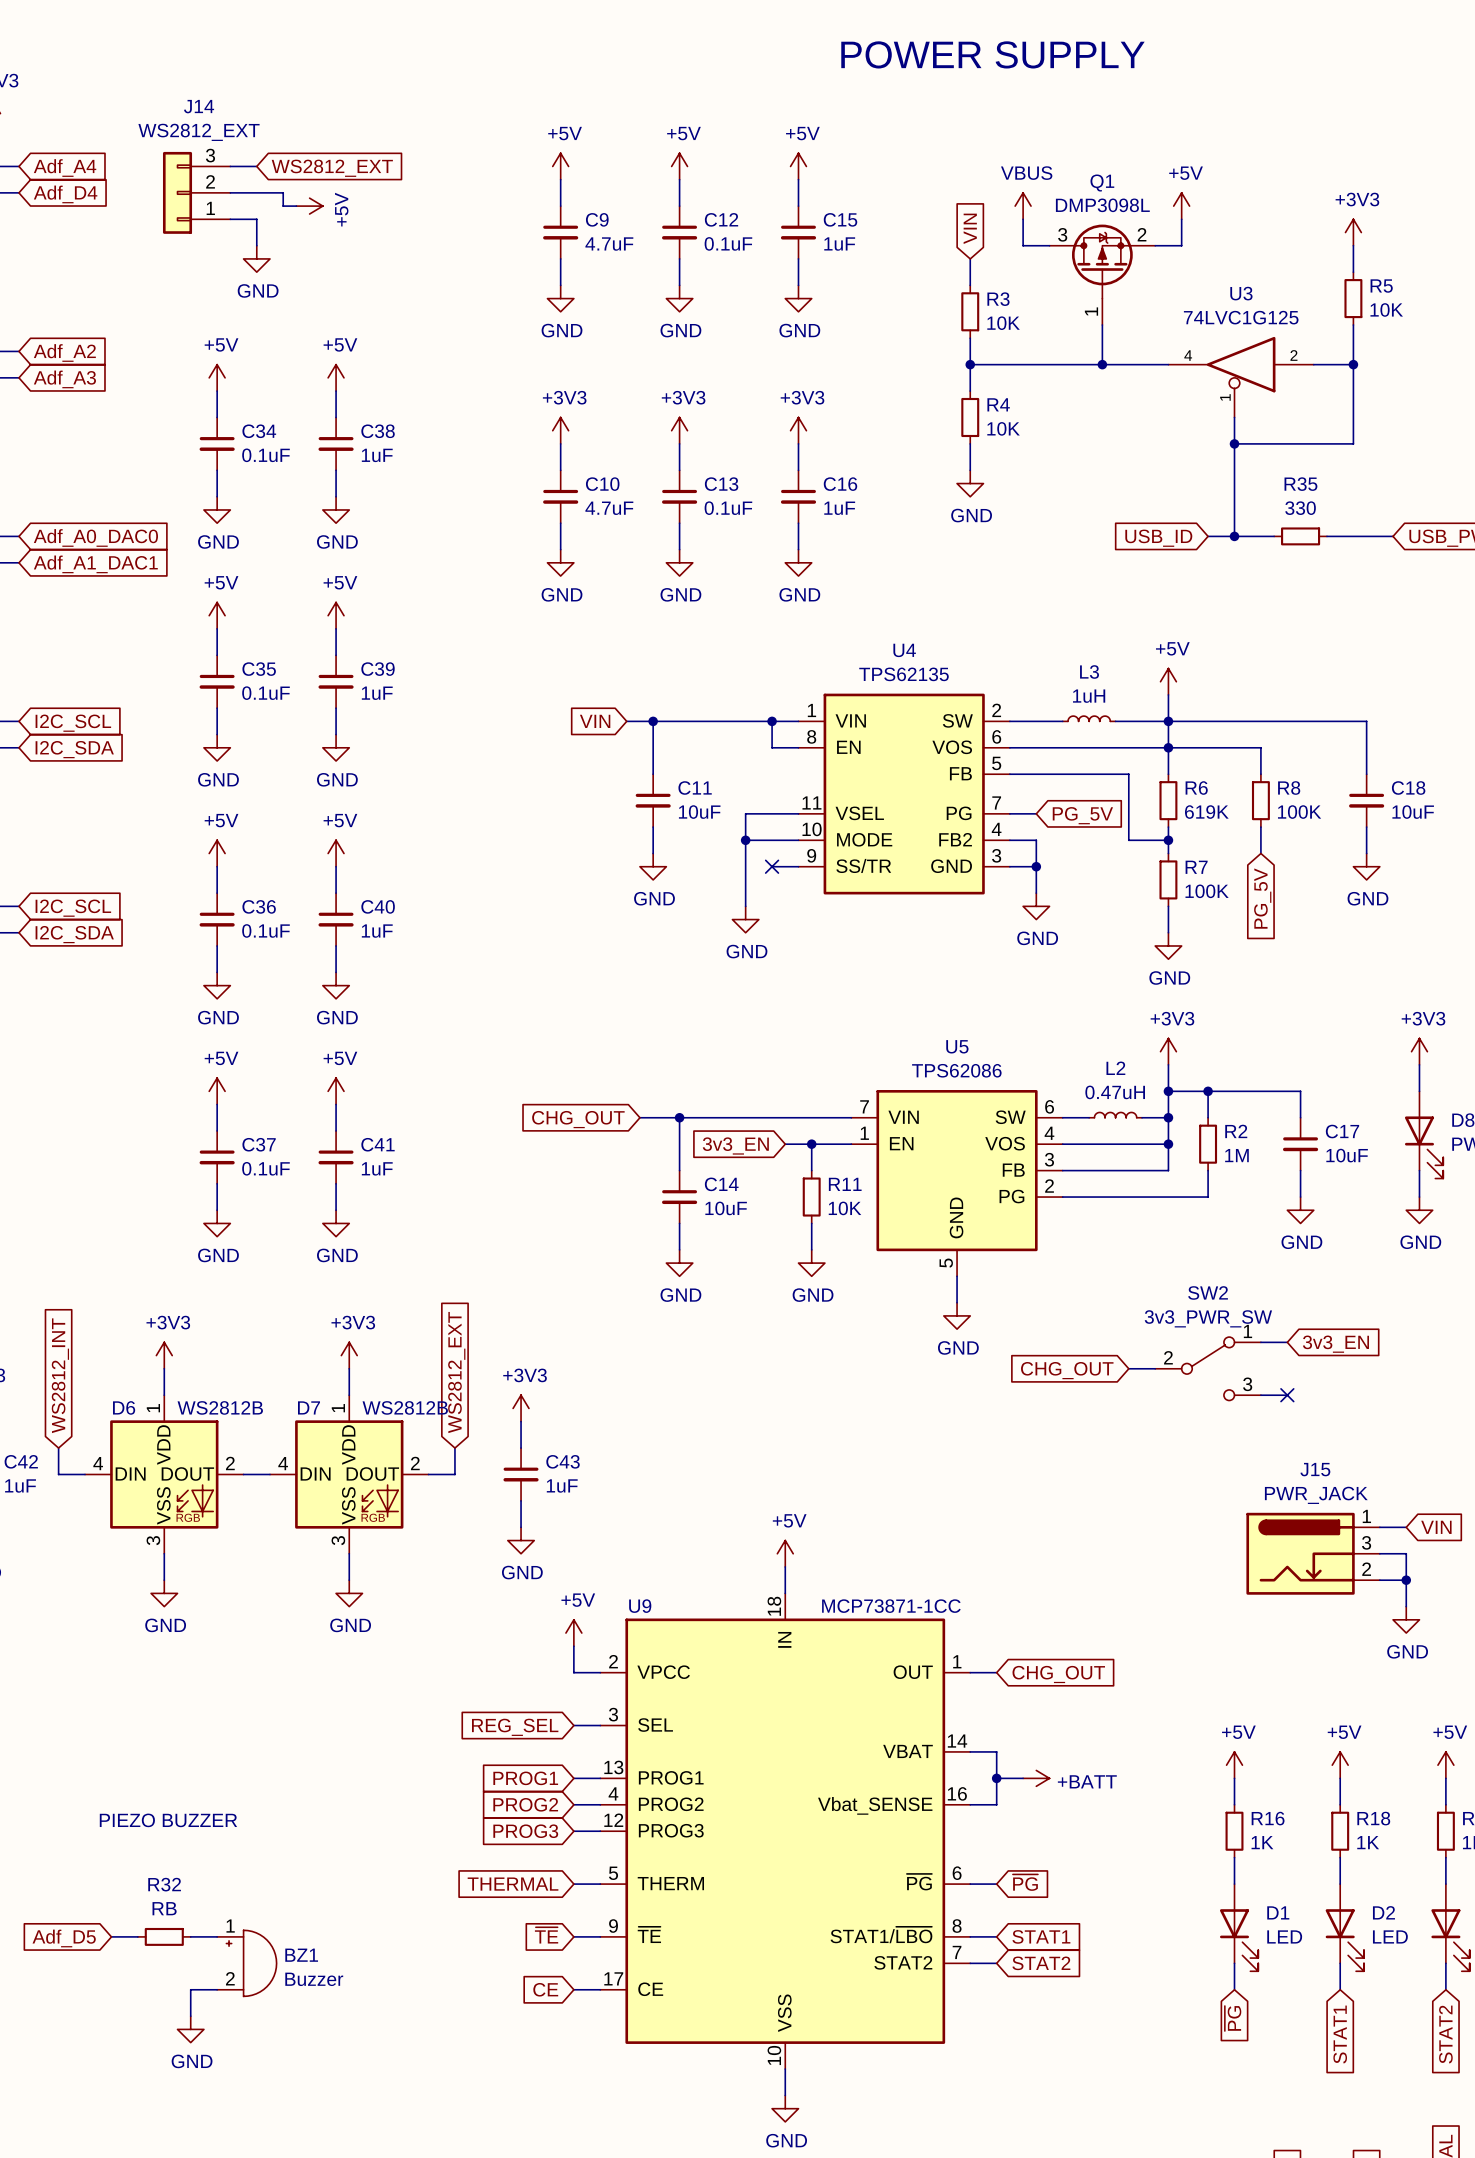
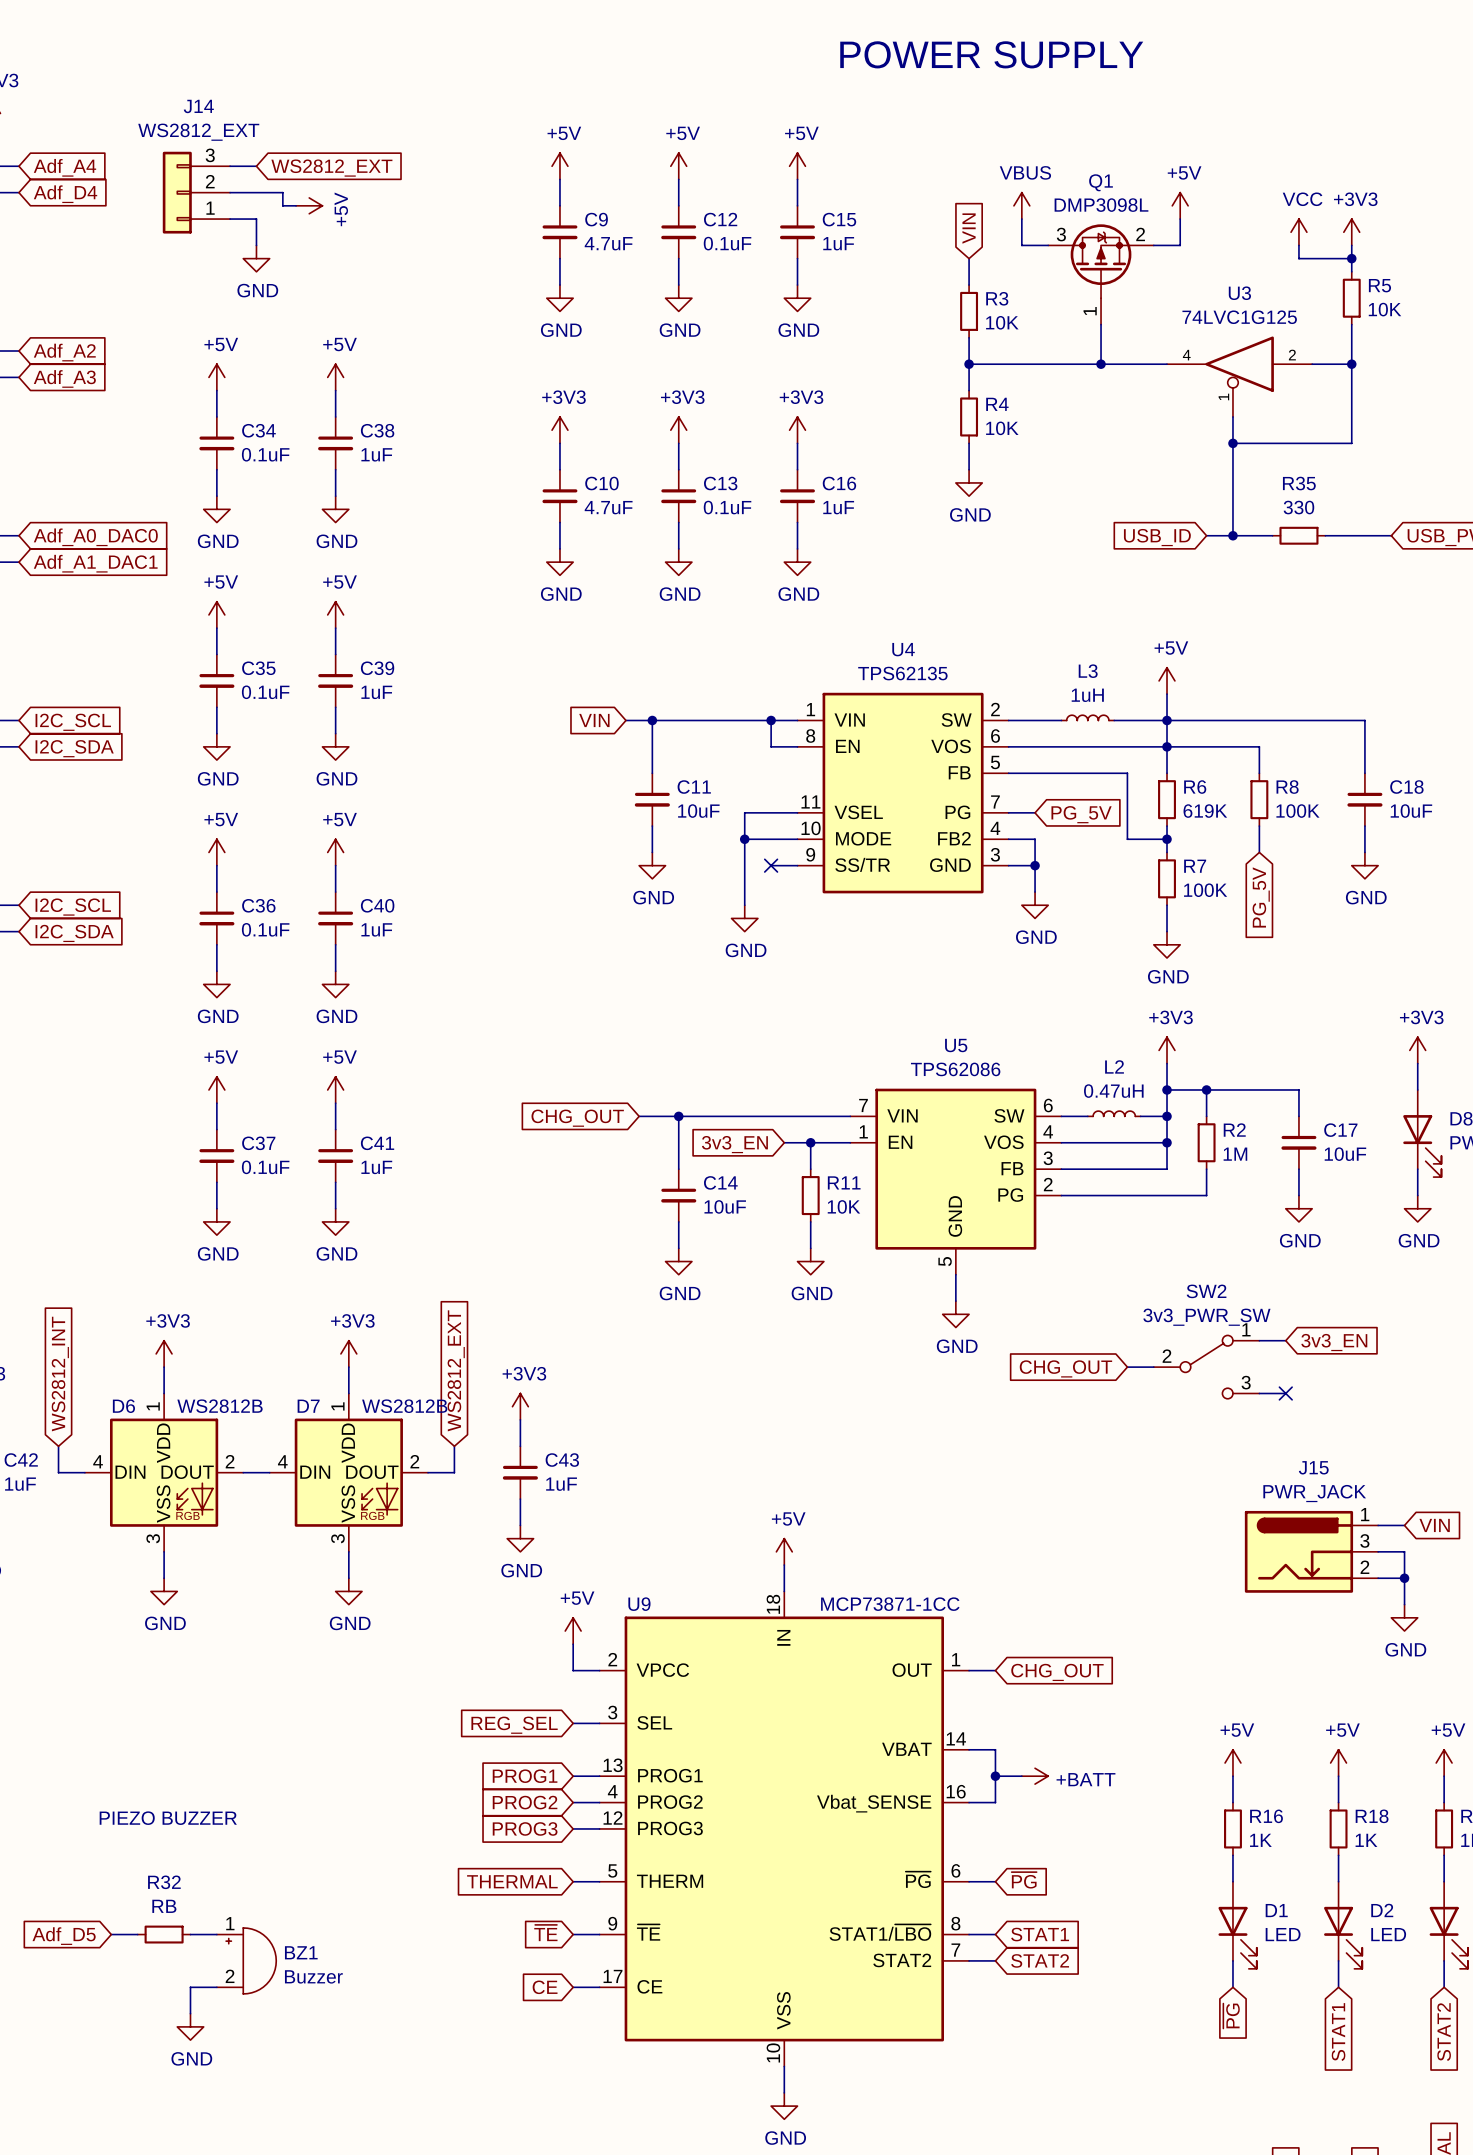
power symbol: none -> VCC (1298, 232)
wire: none -> (1298, 245) (1298, 258) (1351, 258)
junction: none -> (1351, 258)

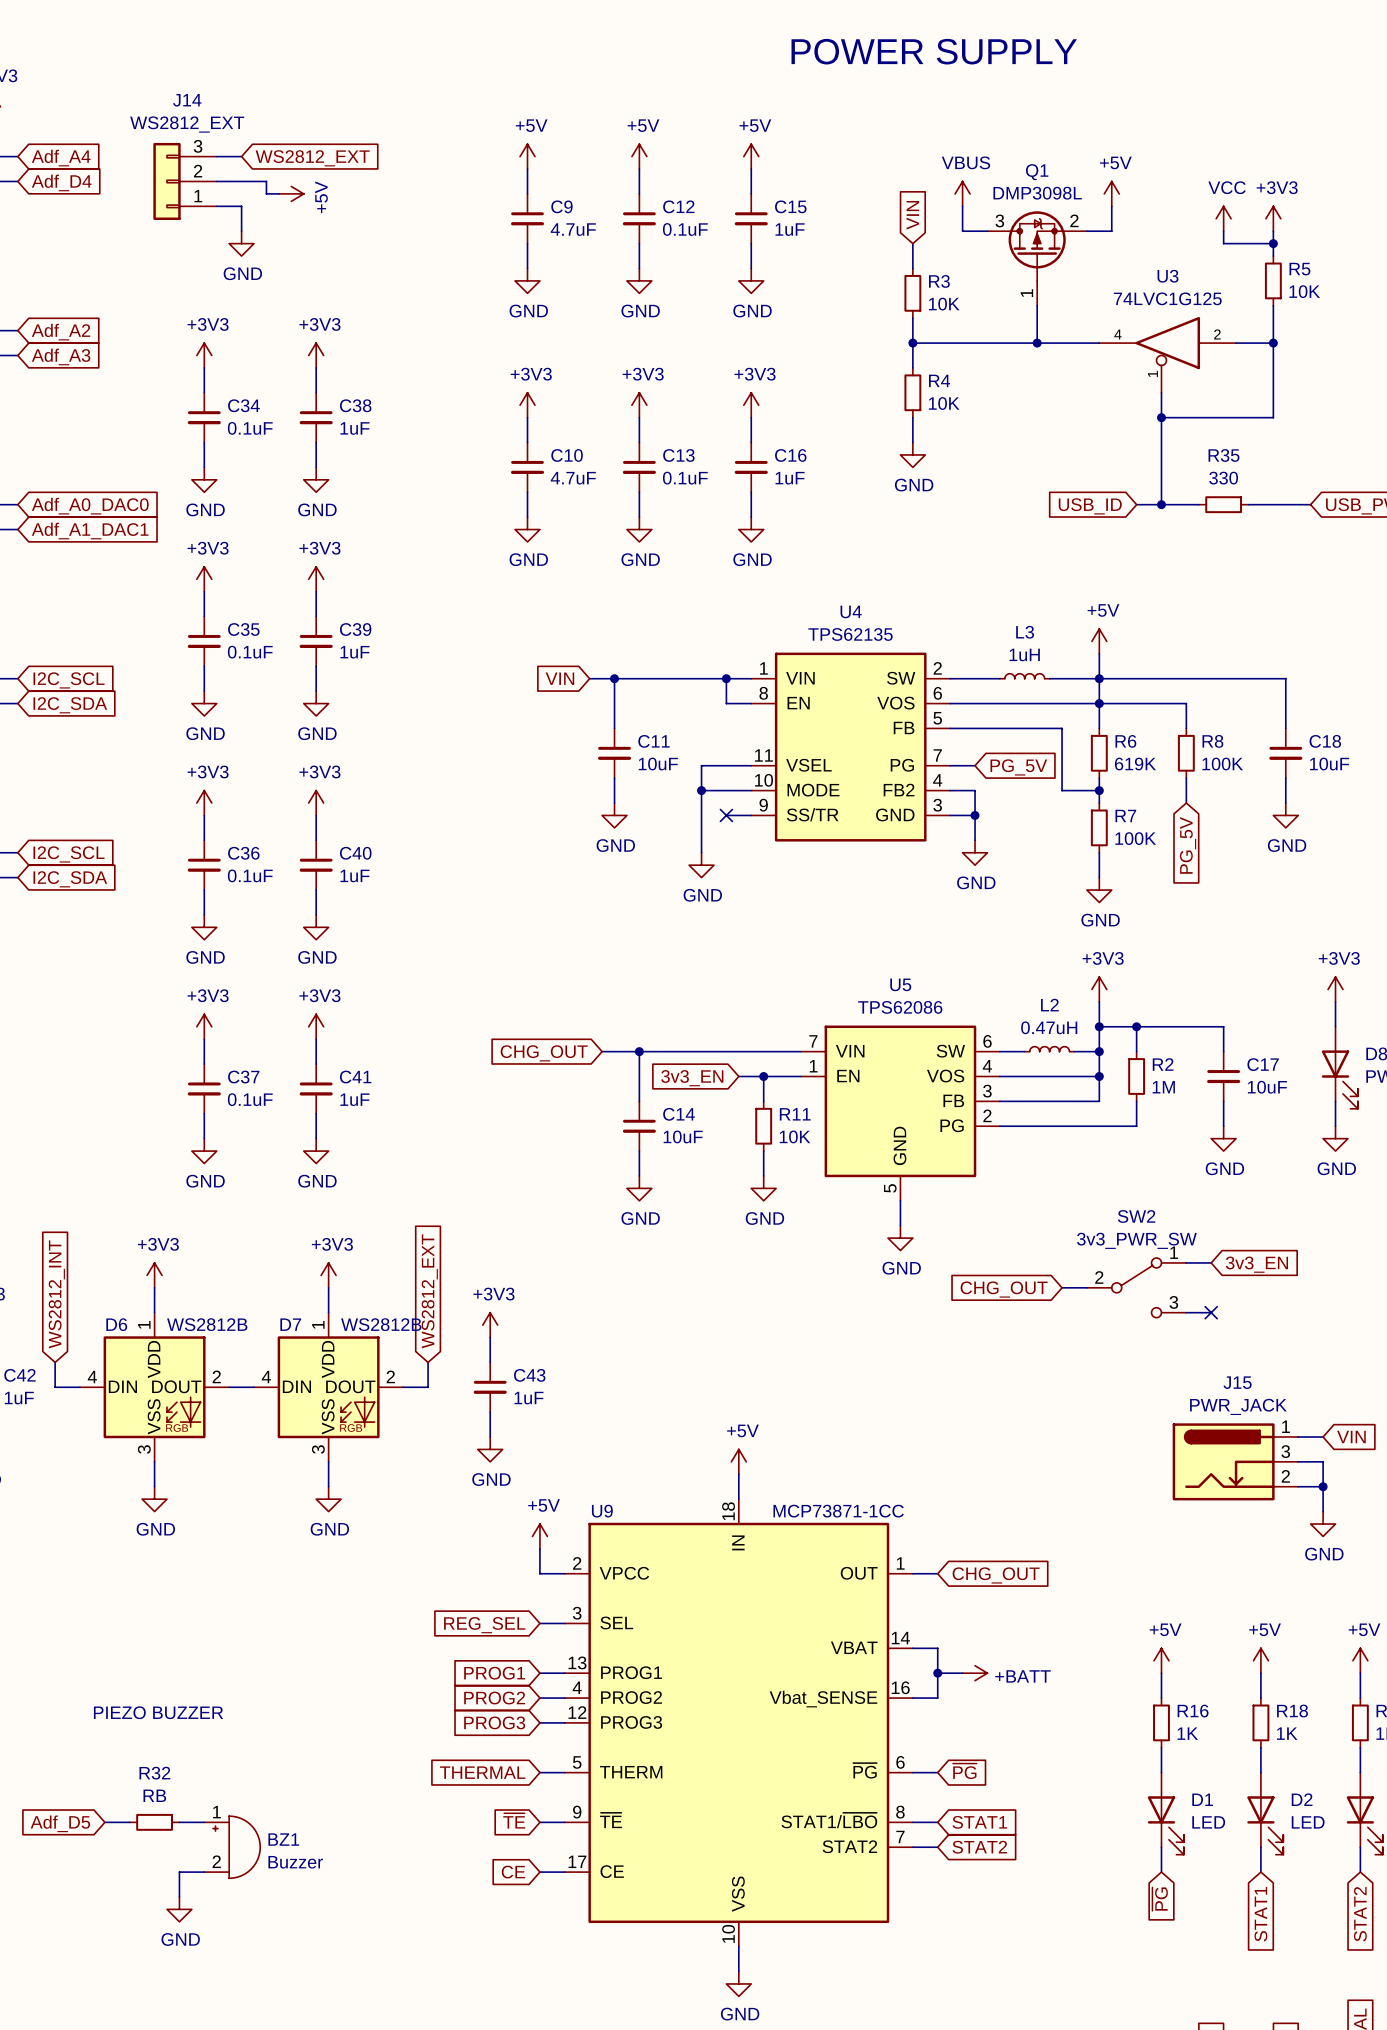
power symbol: +5V (216, 377) -> +3V3 (204, 355)
power symbol: +5V (335, 377) -> +3V3 (316, 355)
power symbol: +5V (216, 614) -> +3V3 (204, 579)
power symbol: +5V (335, 614) -> +3V3 (316, 579)
power symbol: +5V (216, 852) -> +3V3 (204, 803)
power symbol: +5V (335, 852) -> +3V3 (316, 803)
power symbol: +5V (216, 1089) -> +3V3 (204, 1026)
power symbol: +5V (335, 1089) -> +3V3 (316, 1026)

